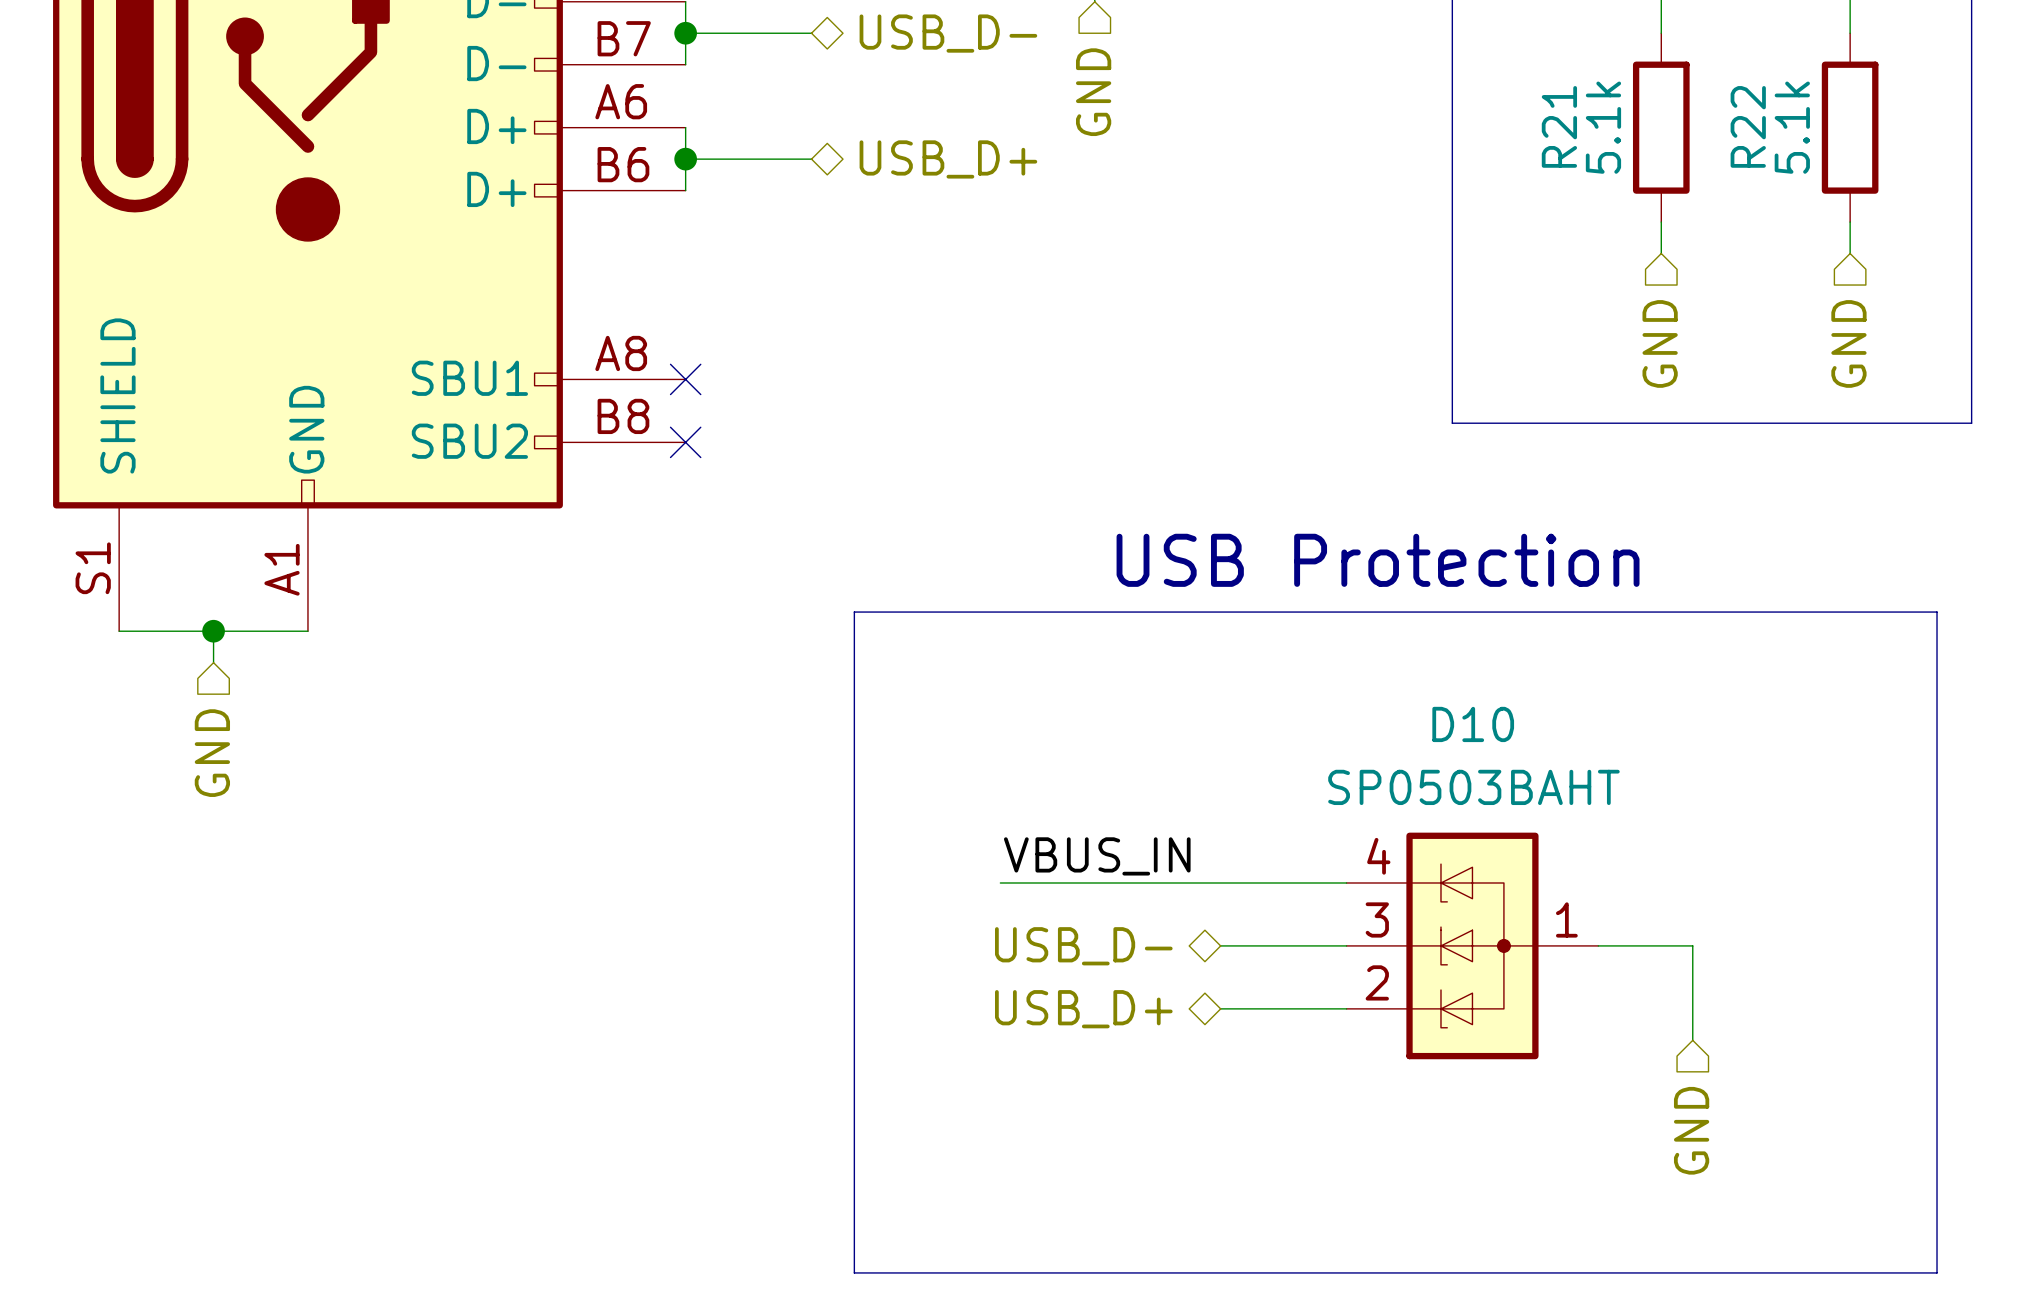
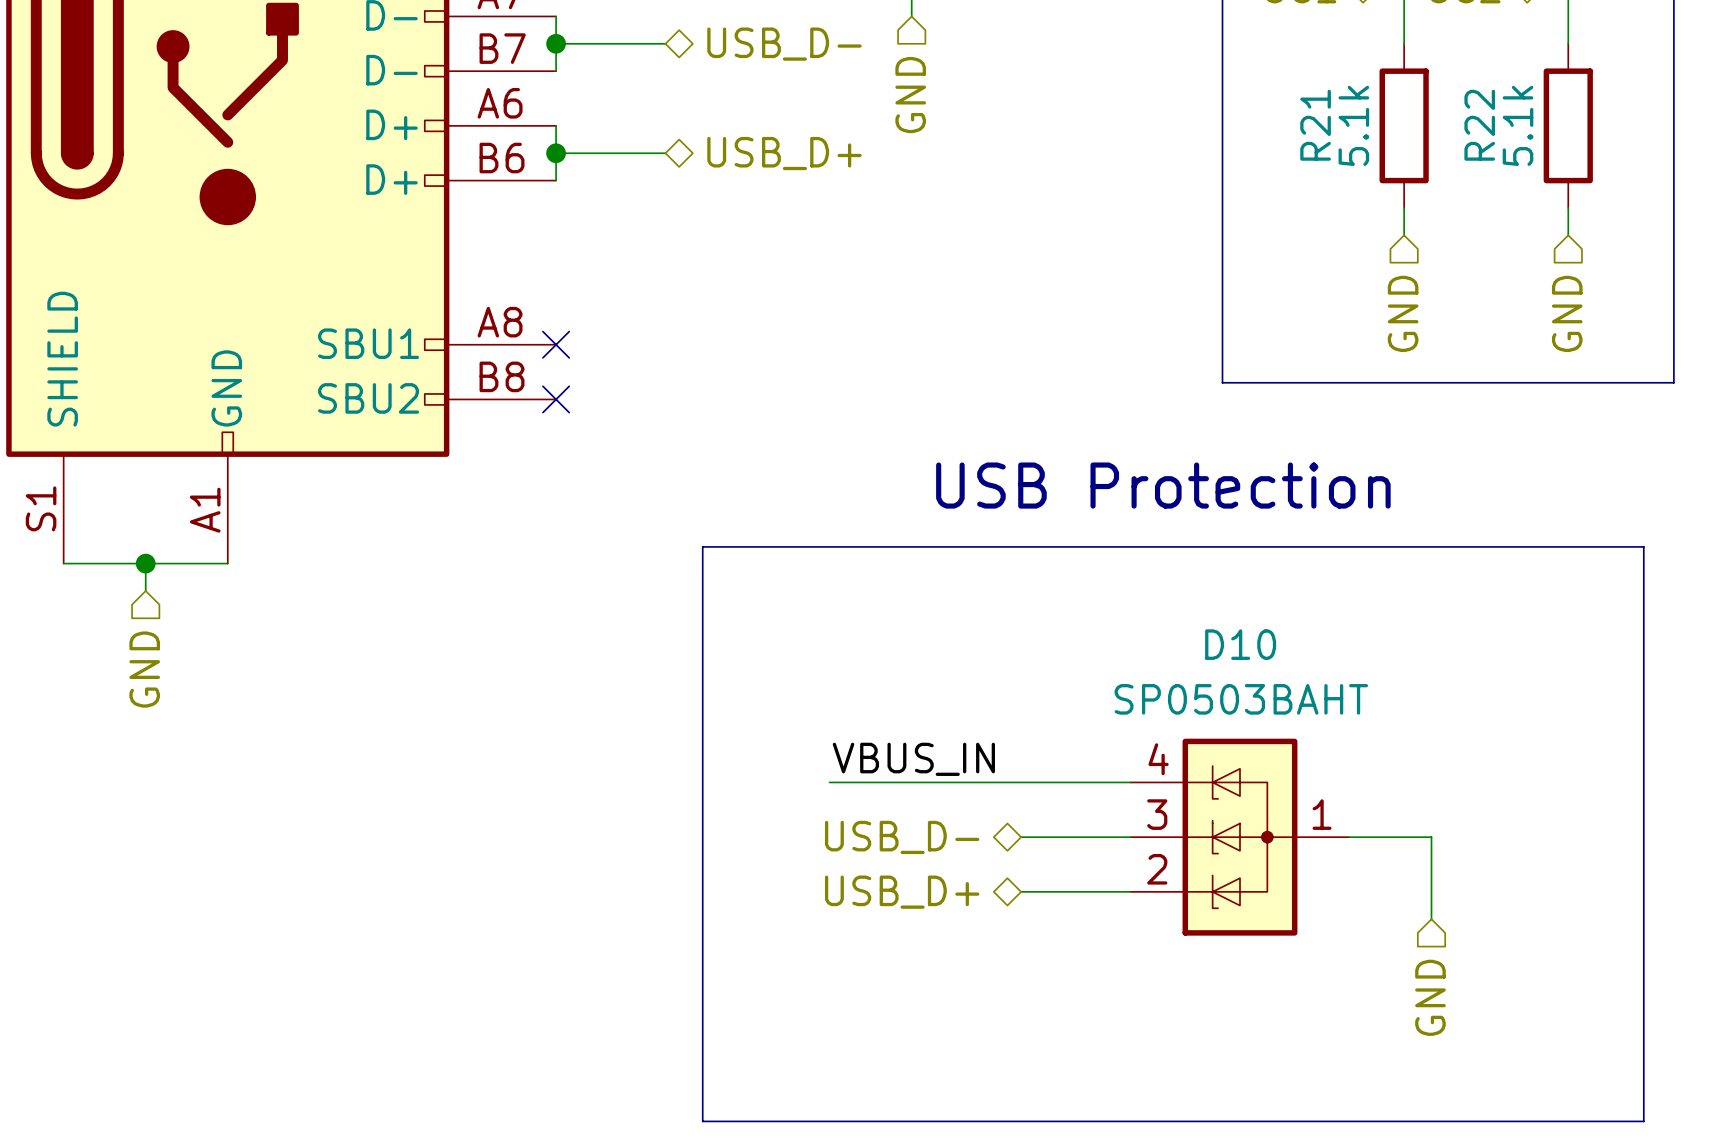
text position: USB Protection (1378, 560) -> USB Protection (1163, 485)

